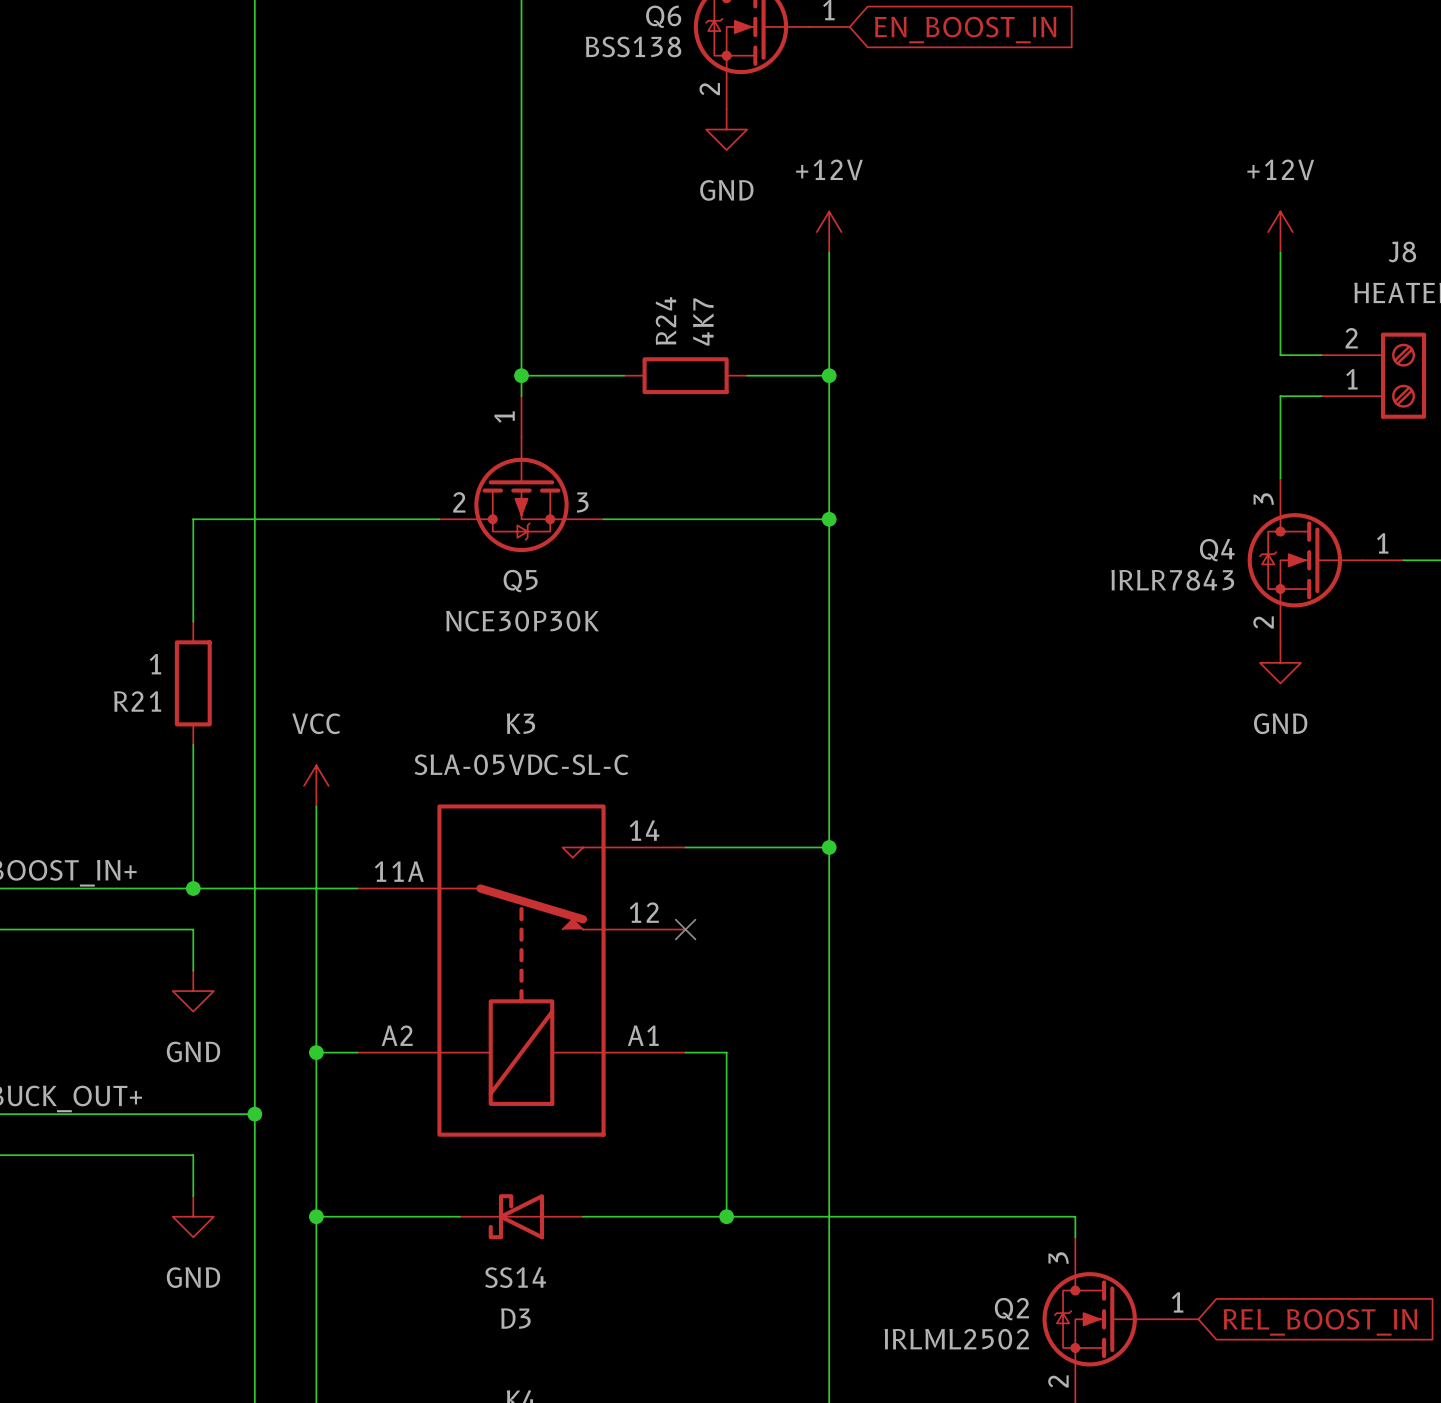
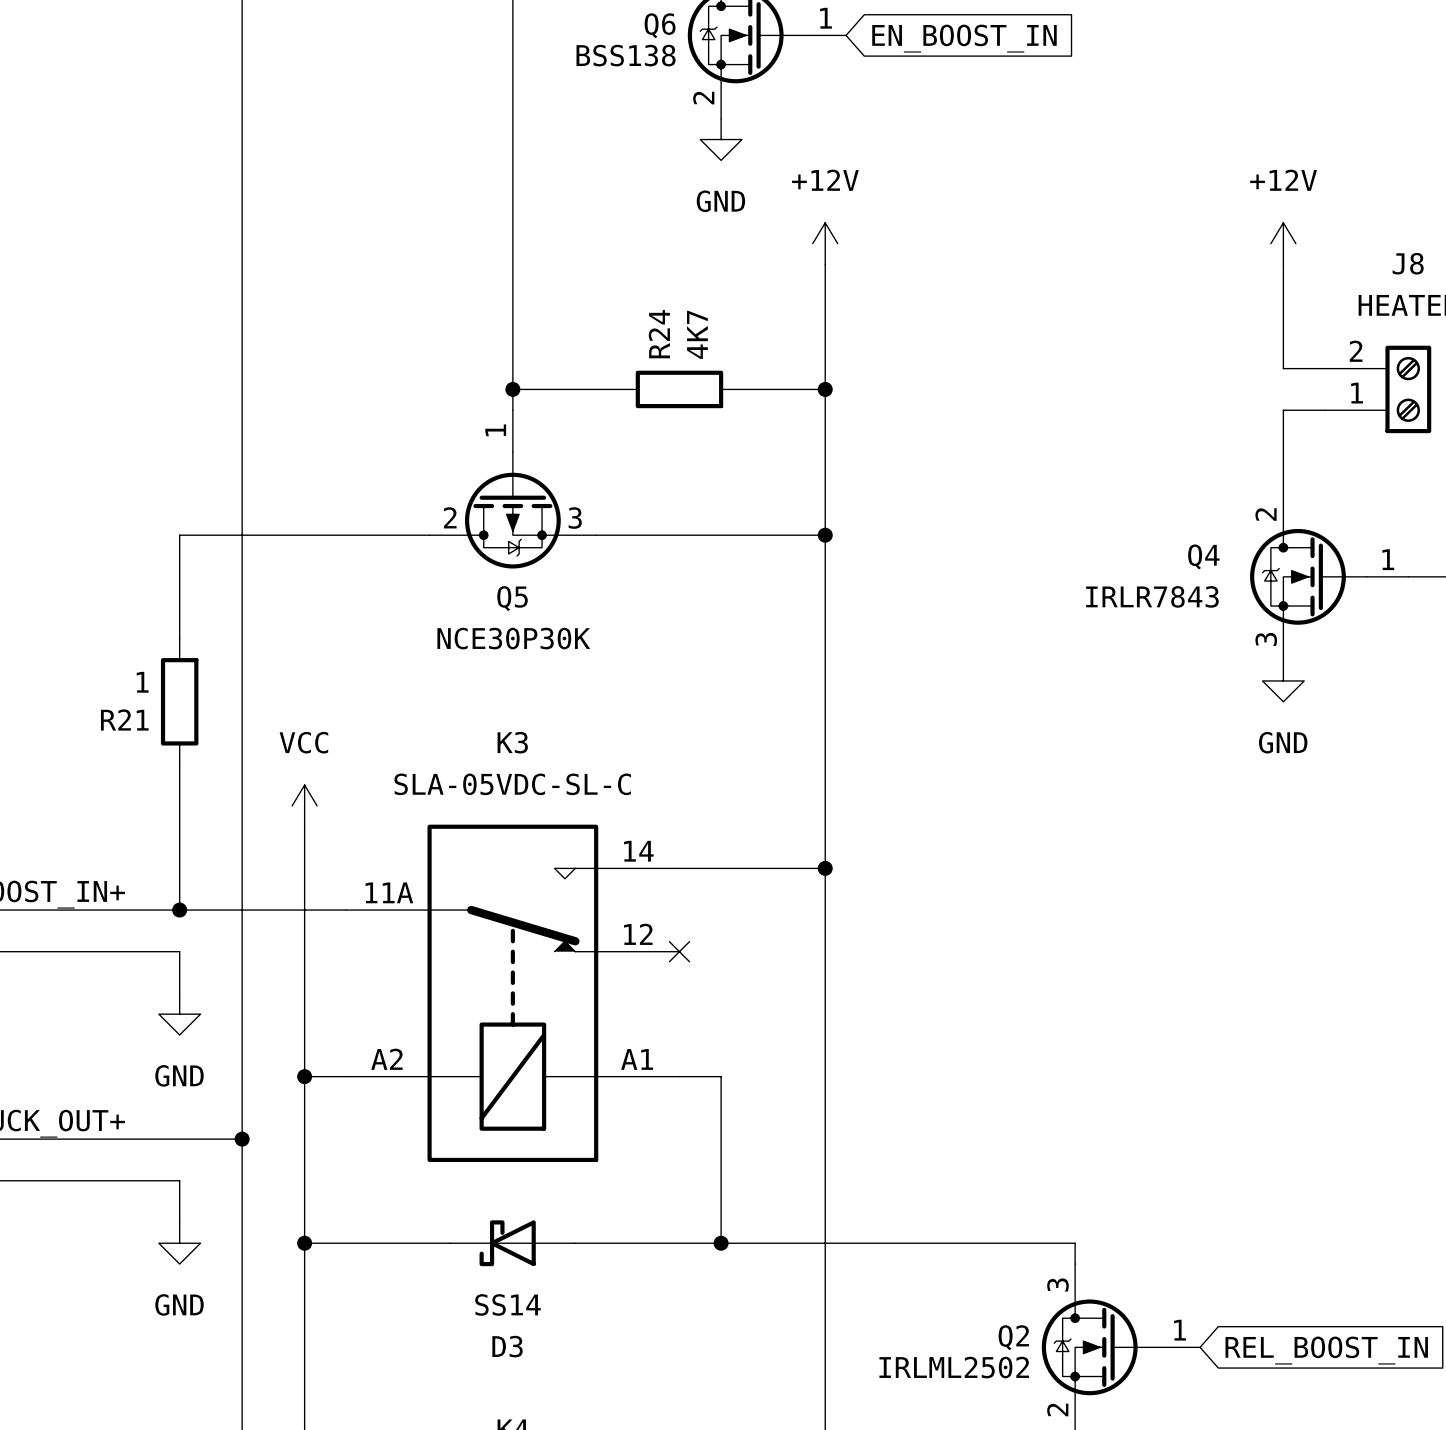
Q4 pin number: 3 (1263, 499) -> 2 (1266, 514)
Q4 name position: Q4 (1217, 550) -> Q4 (1203, 556)
Q4 value position: IRLR7843 (1172, 580) -> IRLR7843 (1152, 596)
Q4 pin number: 2 (1263, 622) -> 3 (1266, 639)

